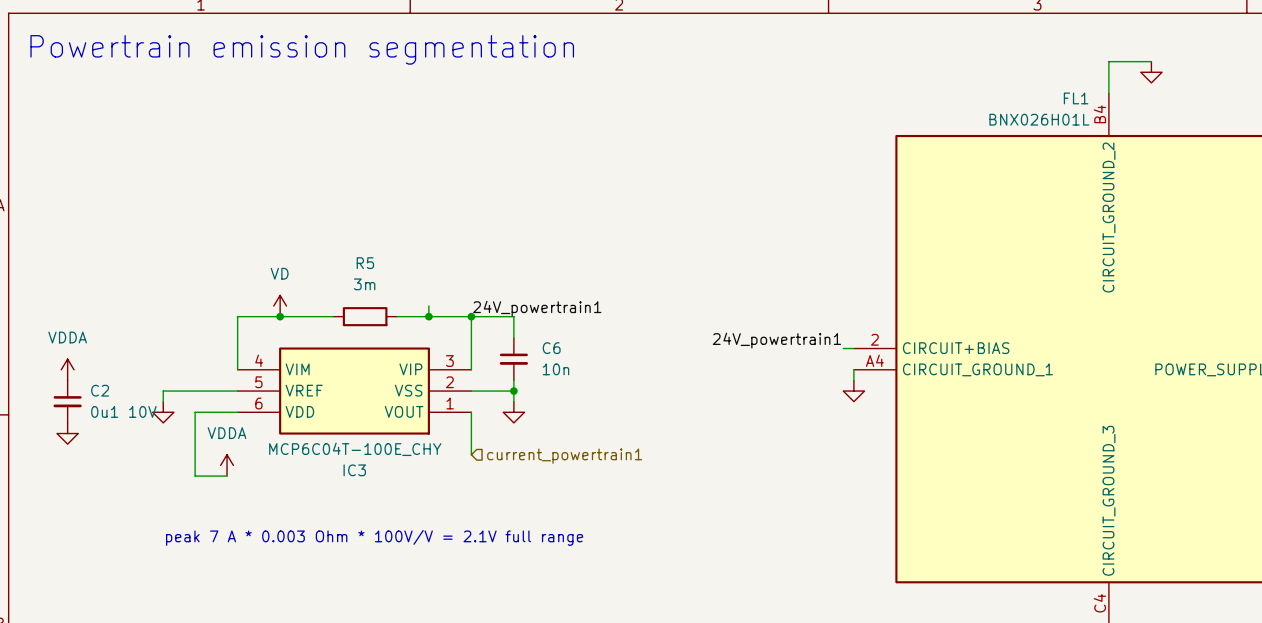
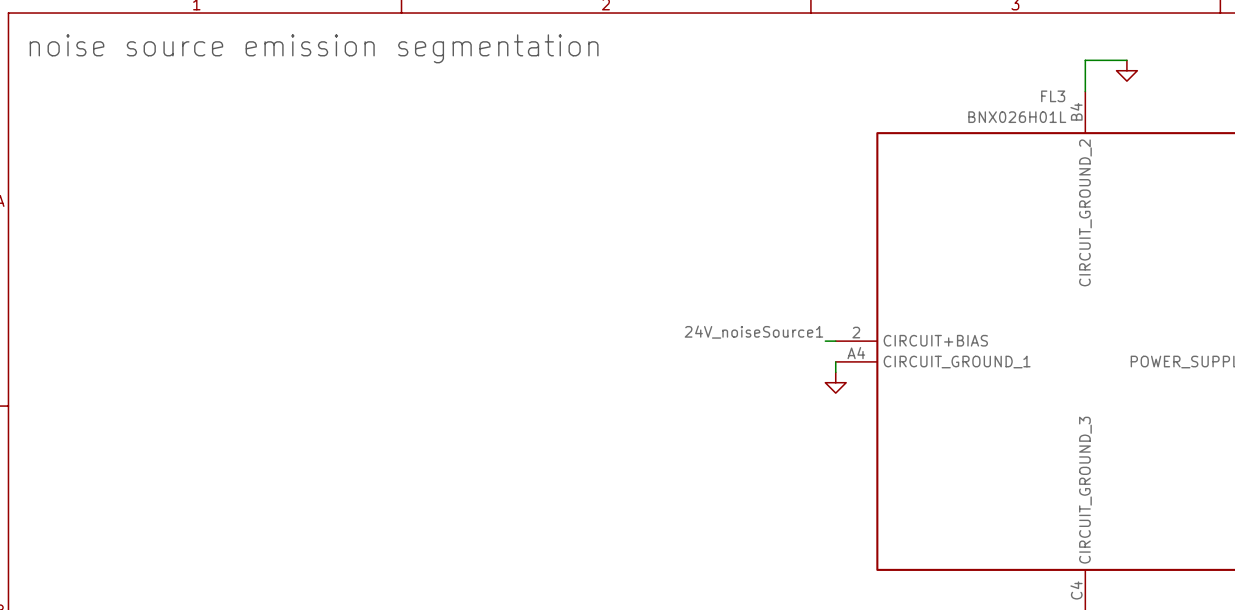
text: Powertrain emission segmentation (302, 49) -> noise source emission segmentation (314, 48)
FL1 name: FL1 (1076, 98) -> FL3 (1053, 96)
power symbol: VD (280, 306) -> none
wire: (428, 306) (428, 316) -> none
label: 24V_powertrain1 (537, 308) -> none
junction: (280, 316) -> none
wire: (333, 316) (237, 316) (237, 369) -> none
R5: 3m (365, 316) -> none
wire: (397, 316) (513, 316) (513, 337) -> none
junction: (428, 316) -> none
wire: (471, 316) (471, 369) -> none
junction: (471, 316) -> none
label: 24V_powertrain1 (776, 340) -> 24V_noiseSource1 (753, 332)
C6: 10n (513, 359) -> none
power symbol: VDDA (67, 369) -> none
wire: (513, 380) (513, 401) -> none
wire: (237, 391) (163, 391) (163, 401) -> none
IC3: MCP6C04T-100E_CHY (354, 391) -> none
wire: (471, 391) (513, 391) -> none
junction: (513, 391) -> none
C2: 0u1 10V (67, 401) -> none
power symbol: (163, 412) -> none
wire: (237, 412) (195, 412) (195, 476) (227, 476) -> none
wire: (471, 412) (471, 454) -> none
power symbol: (513, 412) -> none
power symbol: (67, 433) -> none
hierarchical label: current_powertrain1 (564, 456) -> none
power symbol: VDDA (227, 465) -> none
text: peak 7 A * 0.003 Ohm * 100V/V = 2.1V full range (374, 537) -> none

